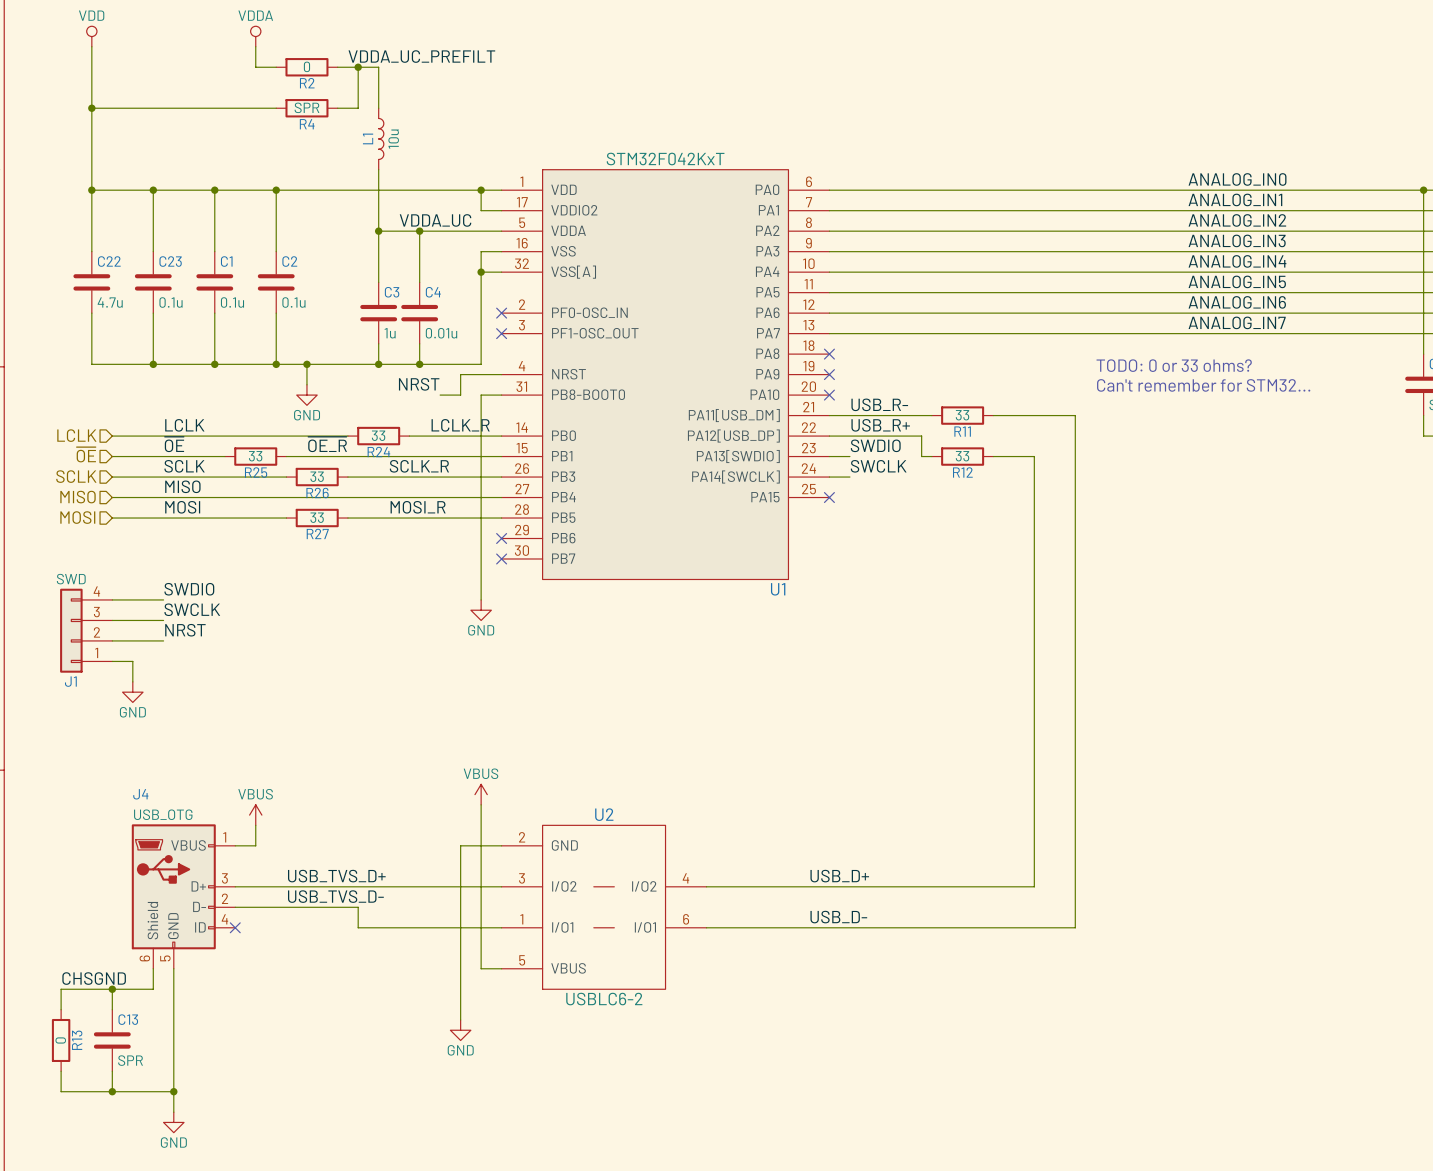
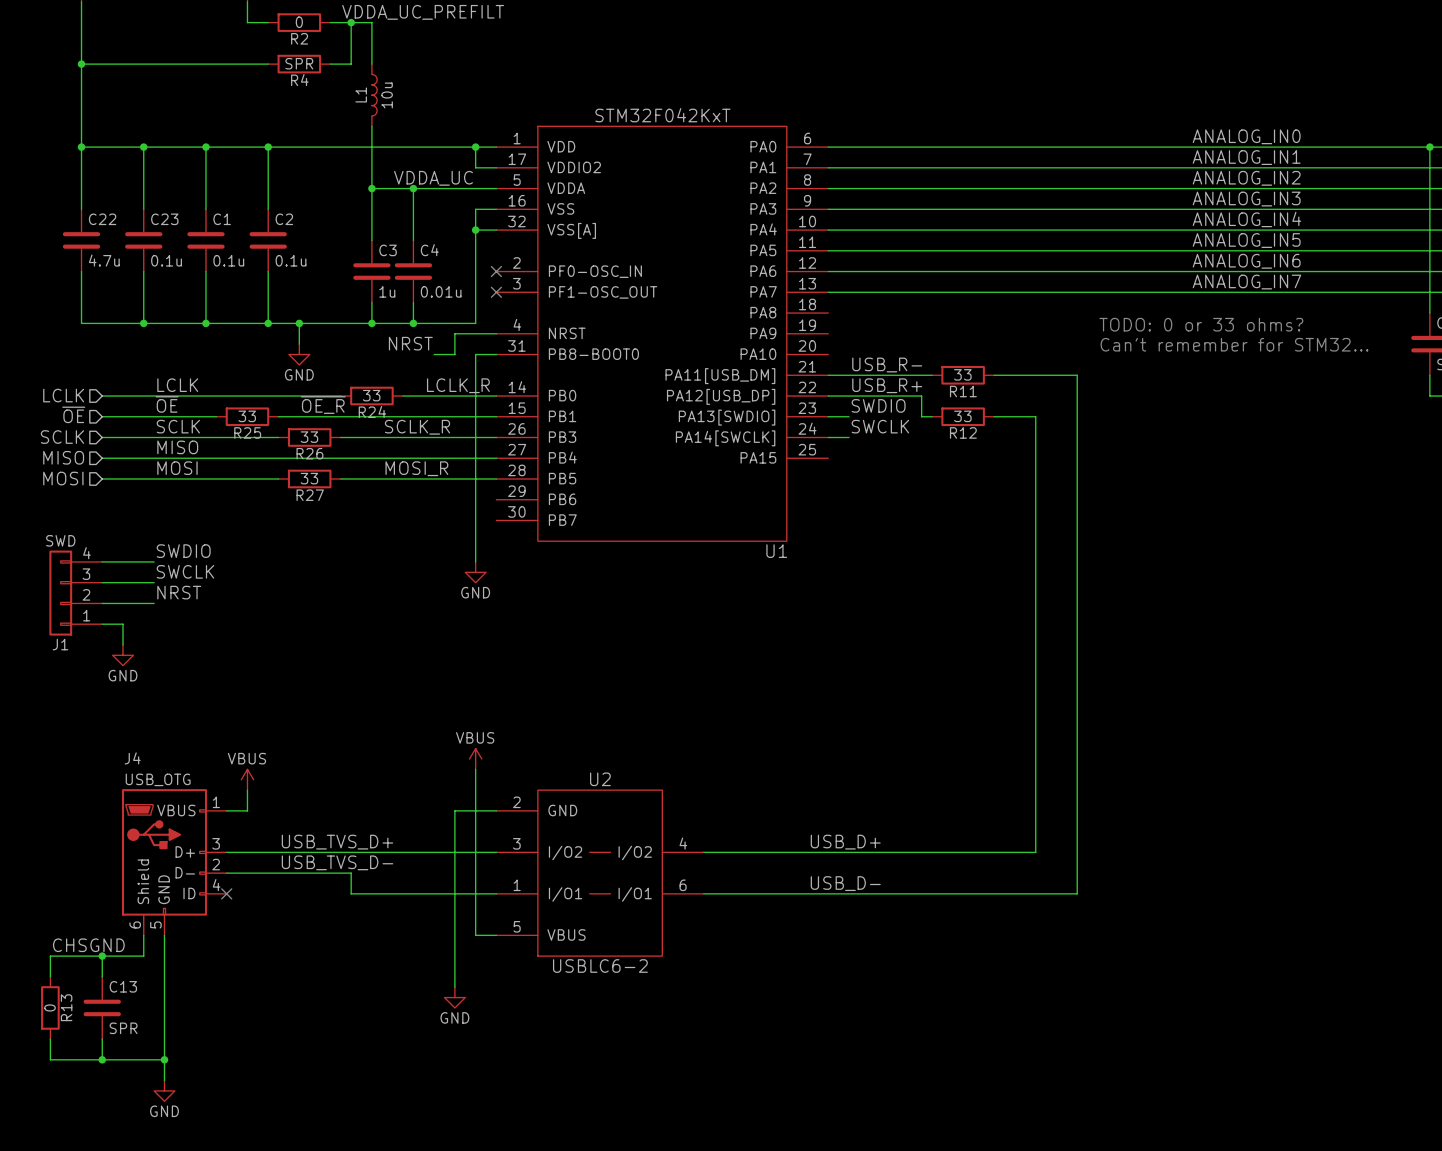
no-connect mark: (829, 354) -> none
no-connect mark: (829, 374) -> none
no-connect mark: (829, 395) -> none
no-connect mark: (829, 497) -> none
no-connect mark: (501, 538) -> none
no-connect mark: (501, 558) -> none

